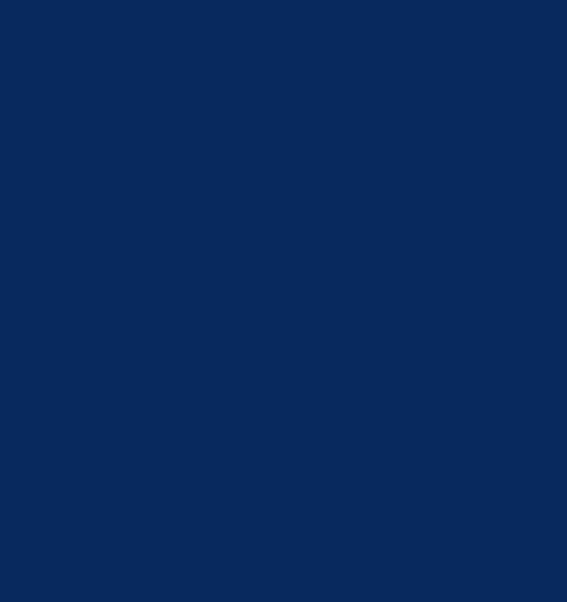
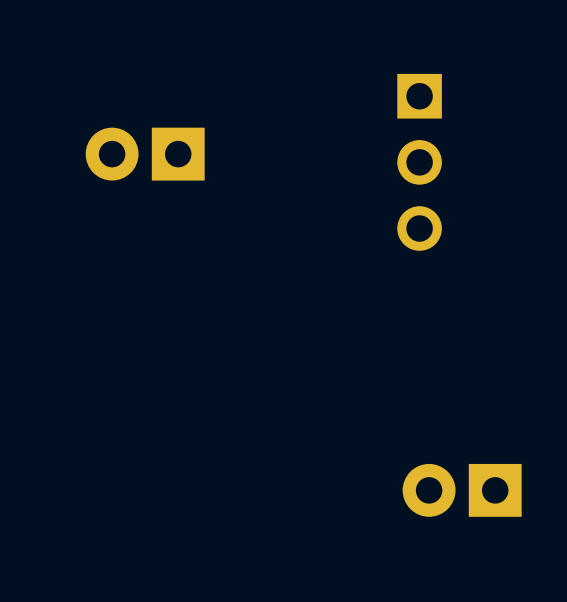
part: none -> (145, 154)
part: none -> (419, 162)
part: none -> (462, 490)

